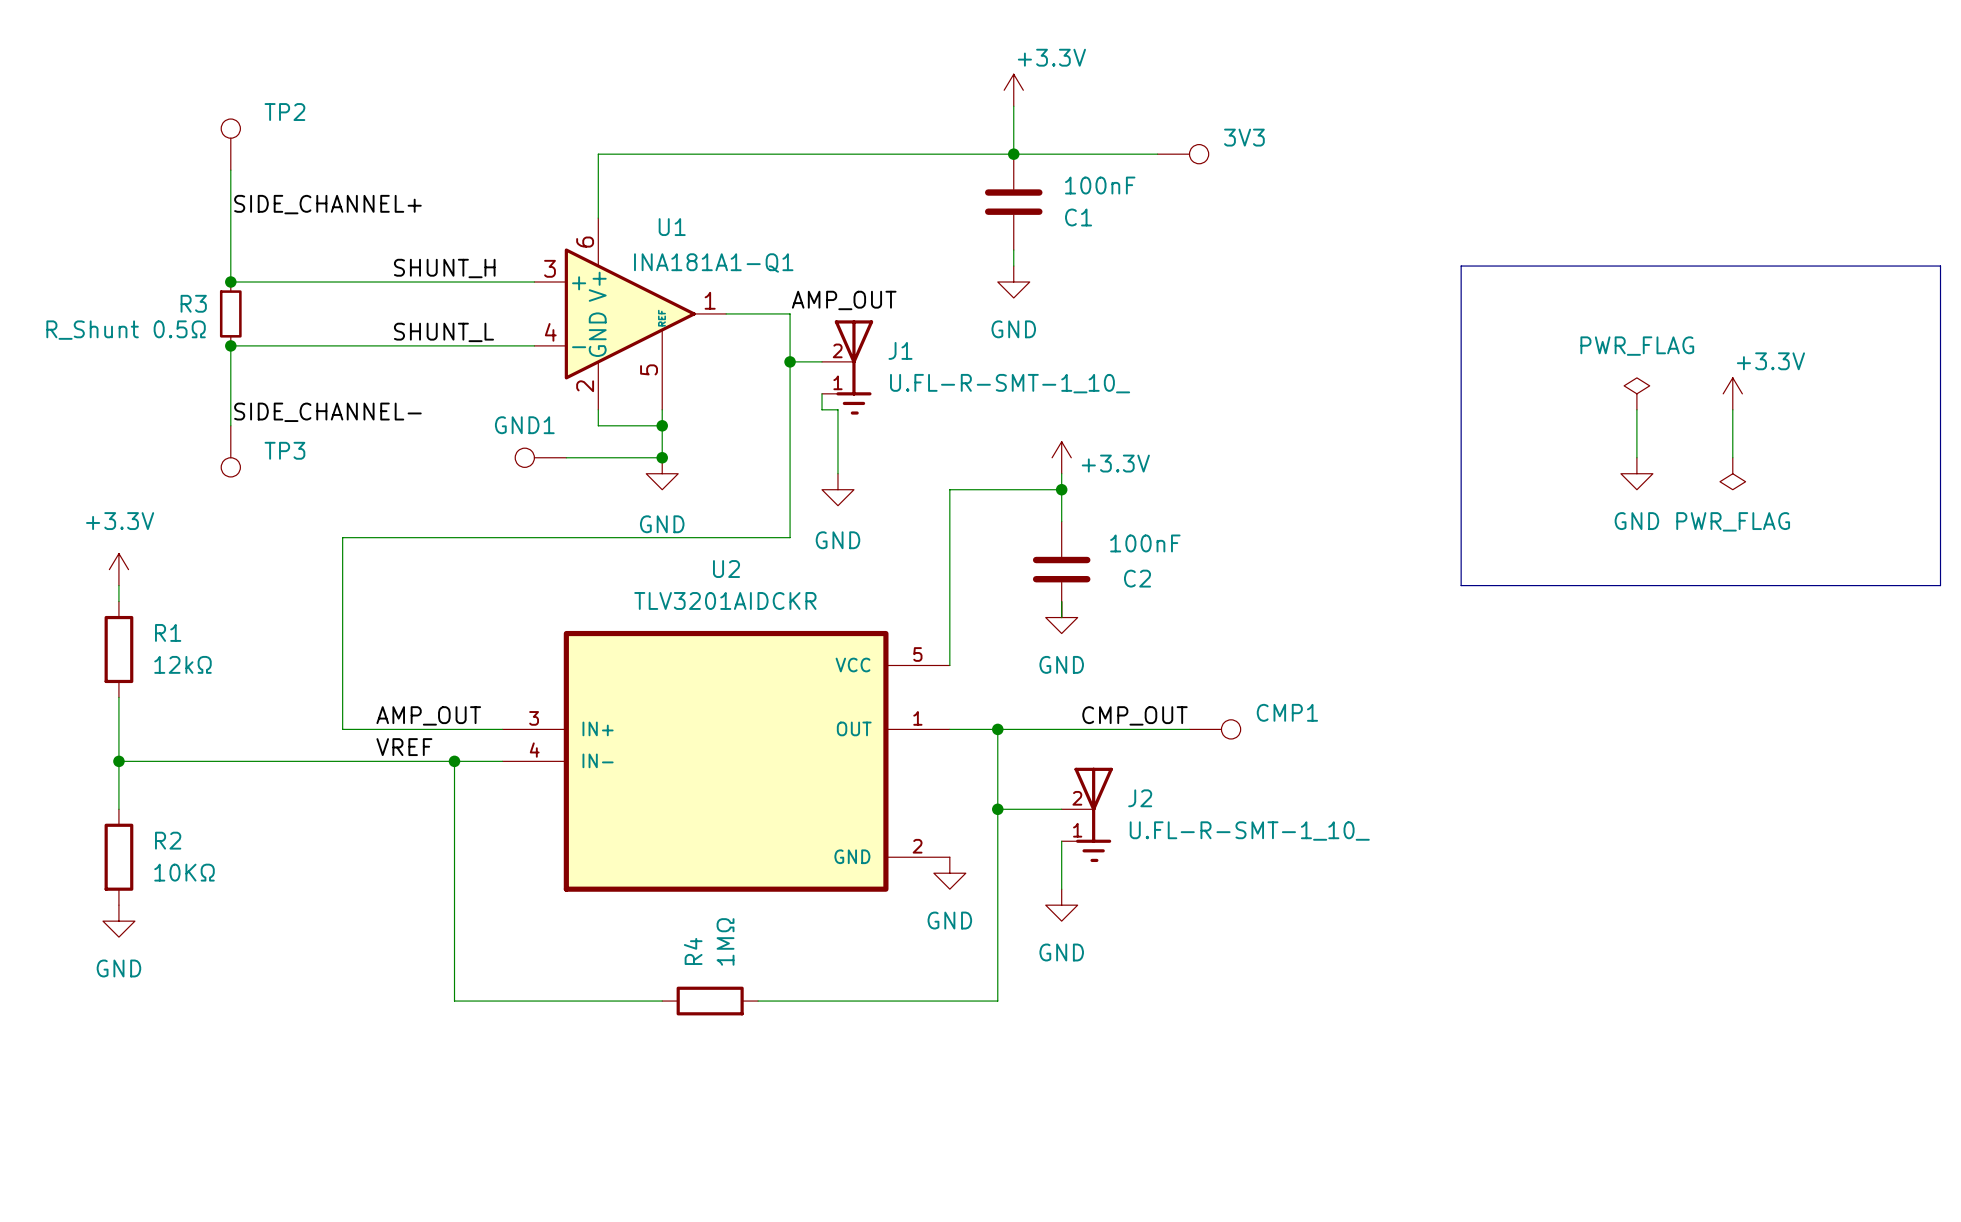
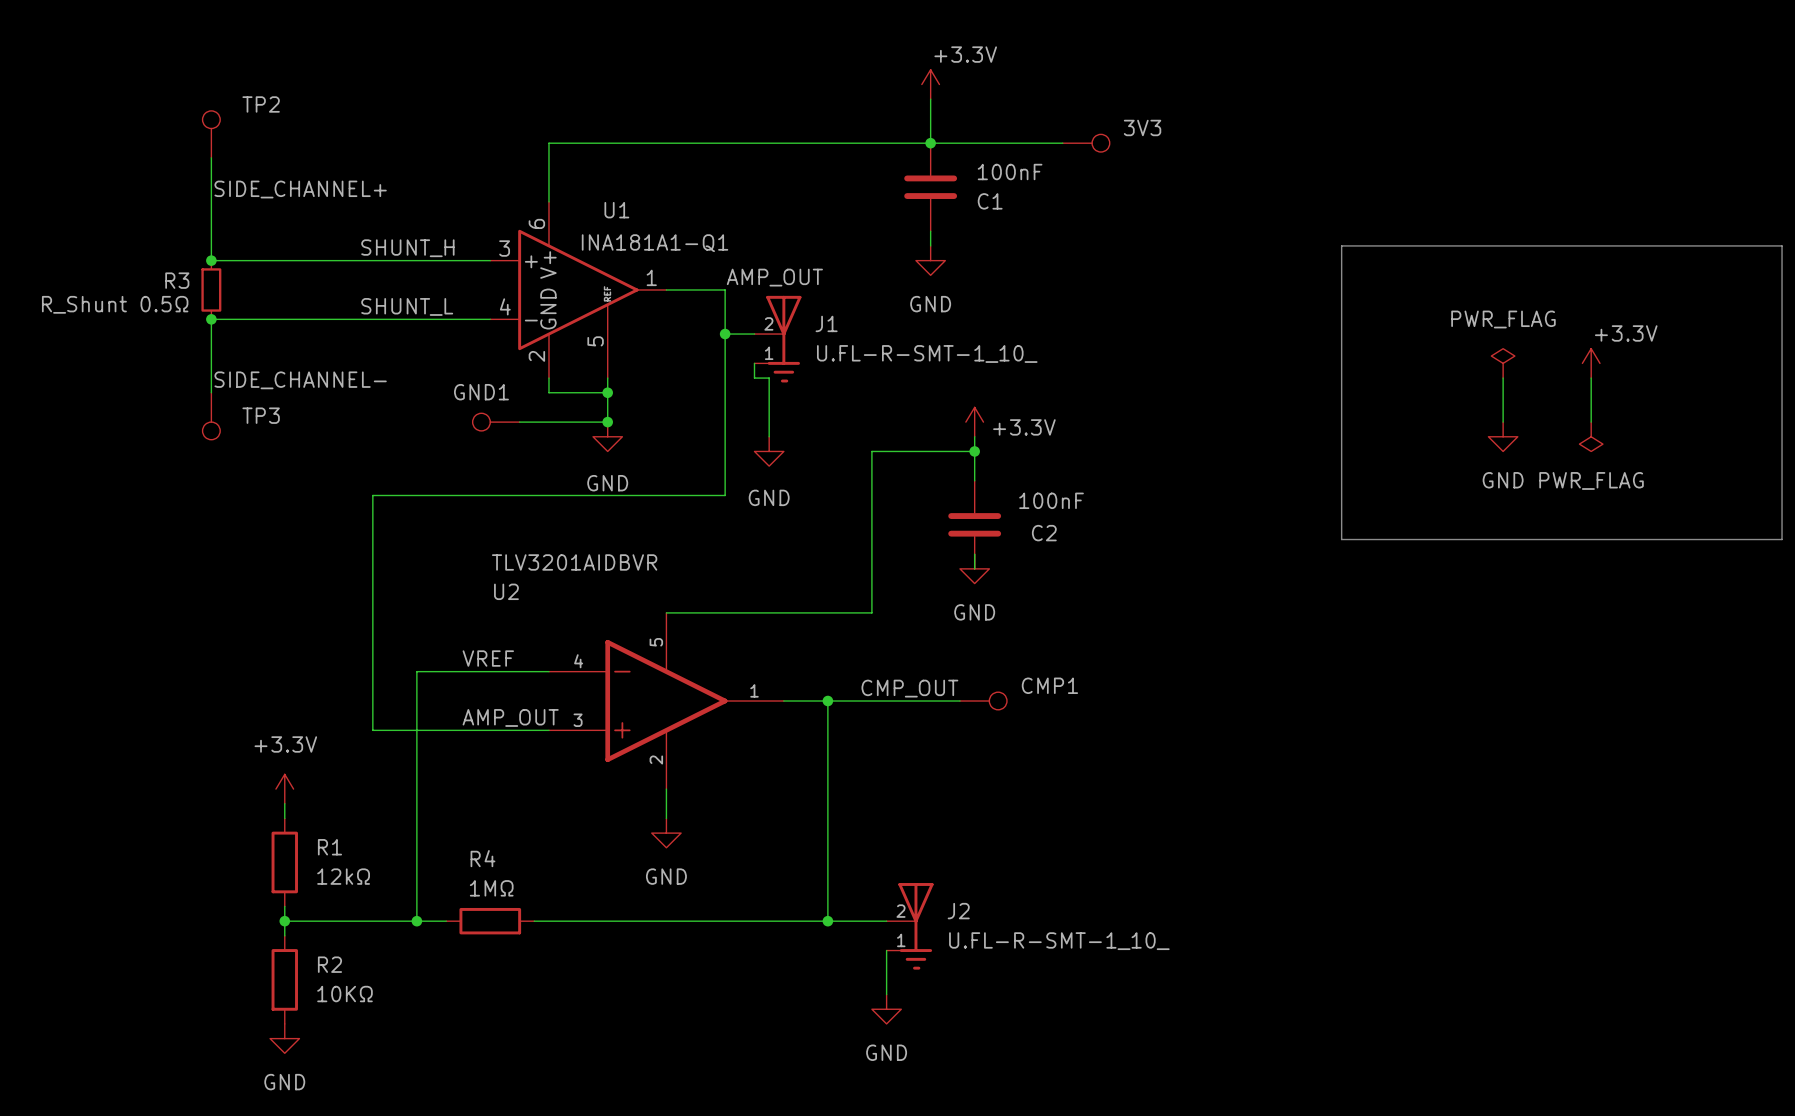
wire: (406, 537) (342, 537) (342, 729) (454, 729) -> (372, 495) (372, 730) (548, 730)
power symbol: +3.3V (118, 569) -> none
U2 name position: U2 (726, 569) -> U2 (506, 591)
wire: (118, 585) (118, 601) -> none
U2 value: TLV3201AIDCKR (725, 600) -> TLV3201AIDBVR (574, 562)
U2 symbol: [502, 630, 950, 892] -> [548, 612, 784, 790]
R1 position: (118, 649) -> (284, 862)
wire: (118, 697) (118, 809) -> none
label position: AMP_OUT (428, 715) -> AMP_OUT (510, 717)
label position: CMP_OUT (1134, 715) -> CMP_OUT (909, 688)
wire: none -> (416, 671) (416, 701)
wire: (949, 729) (1189, 729) -> none
wire: (997, 729) (997, 1001) (965, 1001) -> none
junction: (997, 729) -> none
CMP1 position: (1215, 729) -> (983, 701)
label position: VREF (404, 747) -> VREF (488, 658)
wire: (118, 761) (502, 761) -> none
junction: (118, 761) -> none
junction: (454, 761) -> none
wire: none -> (783, 701) (960, 701)
wire: none -> (827, 701) (827, 921)
junction: none -> (827, 701)
wire: (997, 809) (1061, 809) -> none
junction: (997, 809) -> none
J2 position: (1087, 814) -> (910, 926)
wire: (1061, 841) (1061, 889) -> (886, 950) (886, 994)
R2 position: (118, 857) -> (284, 979)
power symbol: none -> +3.3V (284, 789)
wire: none -> (284, 803) (284, 818)
power symbol: GND (949, 873) -> none
power symbol: none -> GND (666, 833)
power symbol: GND (1061, 905) -> none
power symbol position: GND (118, 921) -> GND (284, 1038)
R4 value rotation: 0° (725, 941) -> 90° clockwise (491, 888)
R4 name rotation: 0° (693, 951) -> 90° clockwise (482, 858)
wire: none -> (284, 906) (284, 935)
wire: none -> (284, 921) (416, 921)
junction: none -> (284, 921)
junction: none -> (416, 921)
wire: (486, 1001) (582, 1001) -> (607, 921) (695, 921)
R4 position: (710, 1001) -> (490, 921)
junction: none -> (827, 921)
power symbol: none -> GND (886, 1009)

